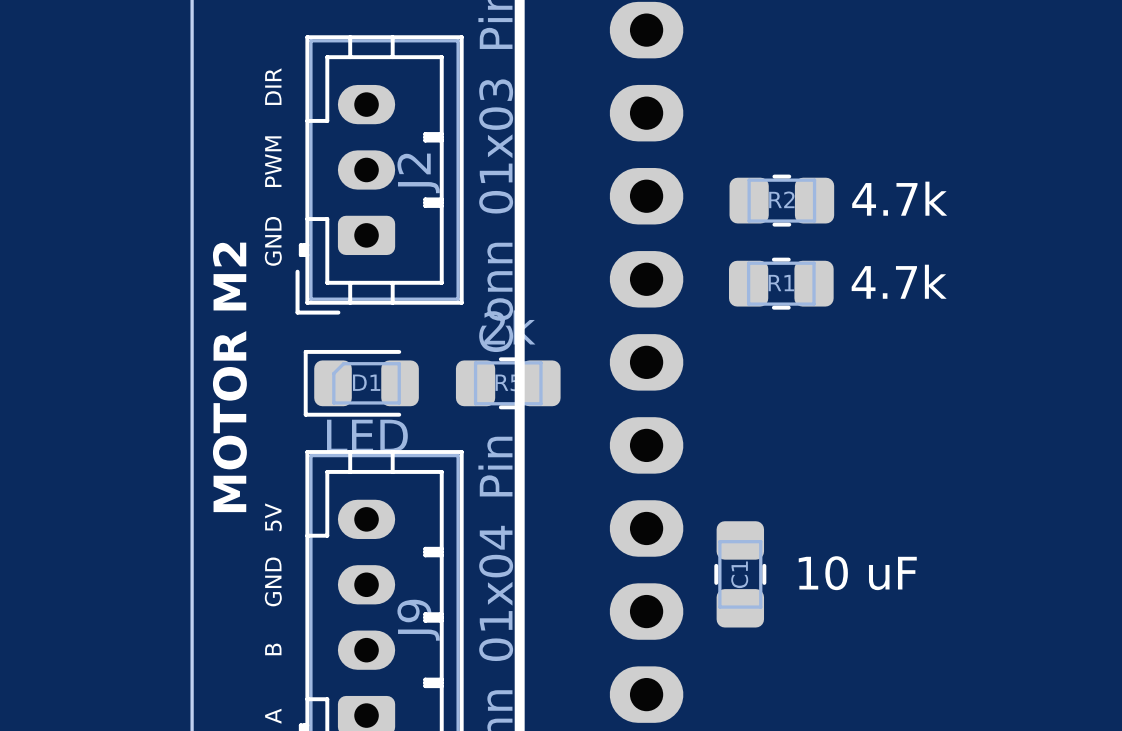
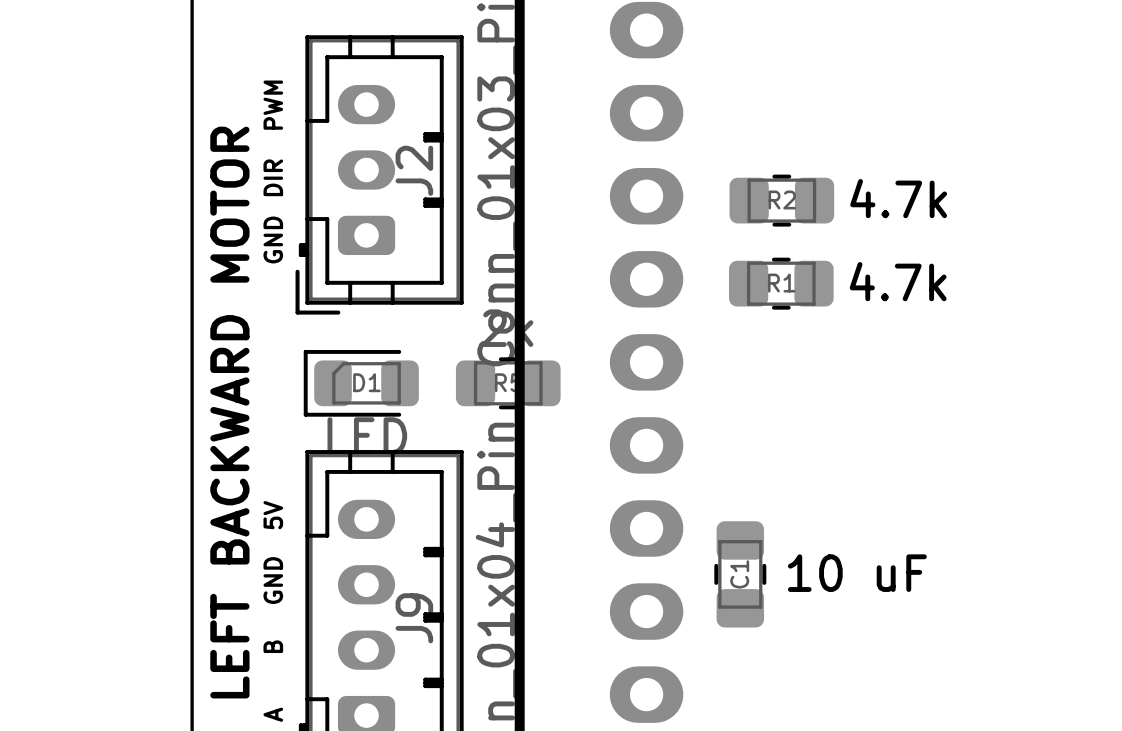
text position: DIR (273, 86) -> DIR (273, 177)
text position: PWM (273, 161) -> PWM (273, 105)
text: MOTOR M2 (229, 377) -> none
text: none -> LEFT BACKWARD MOTOR (229, 412)

